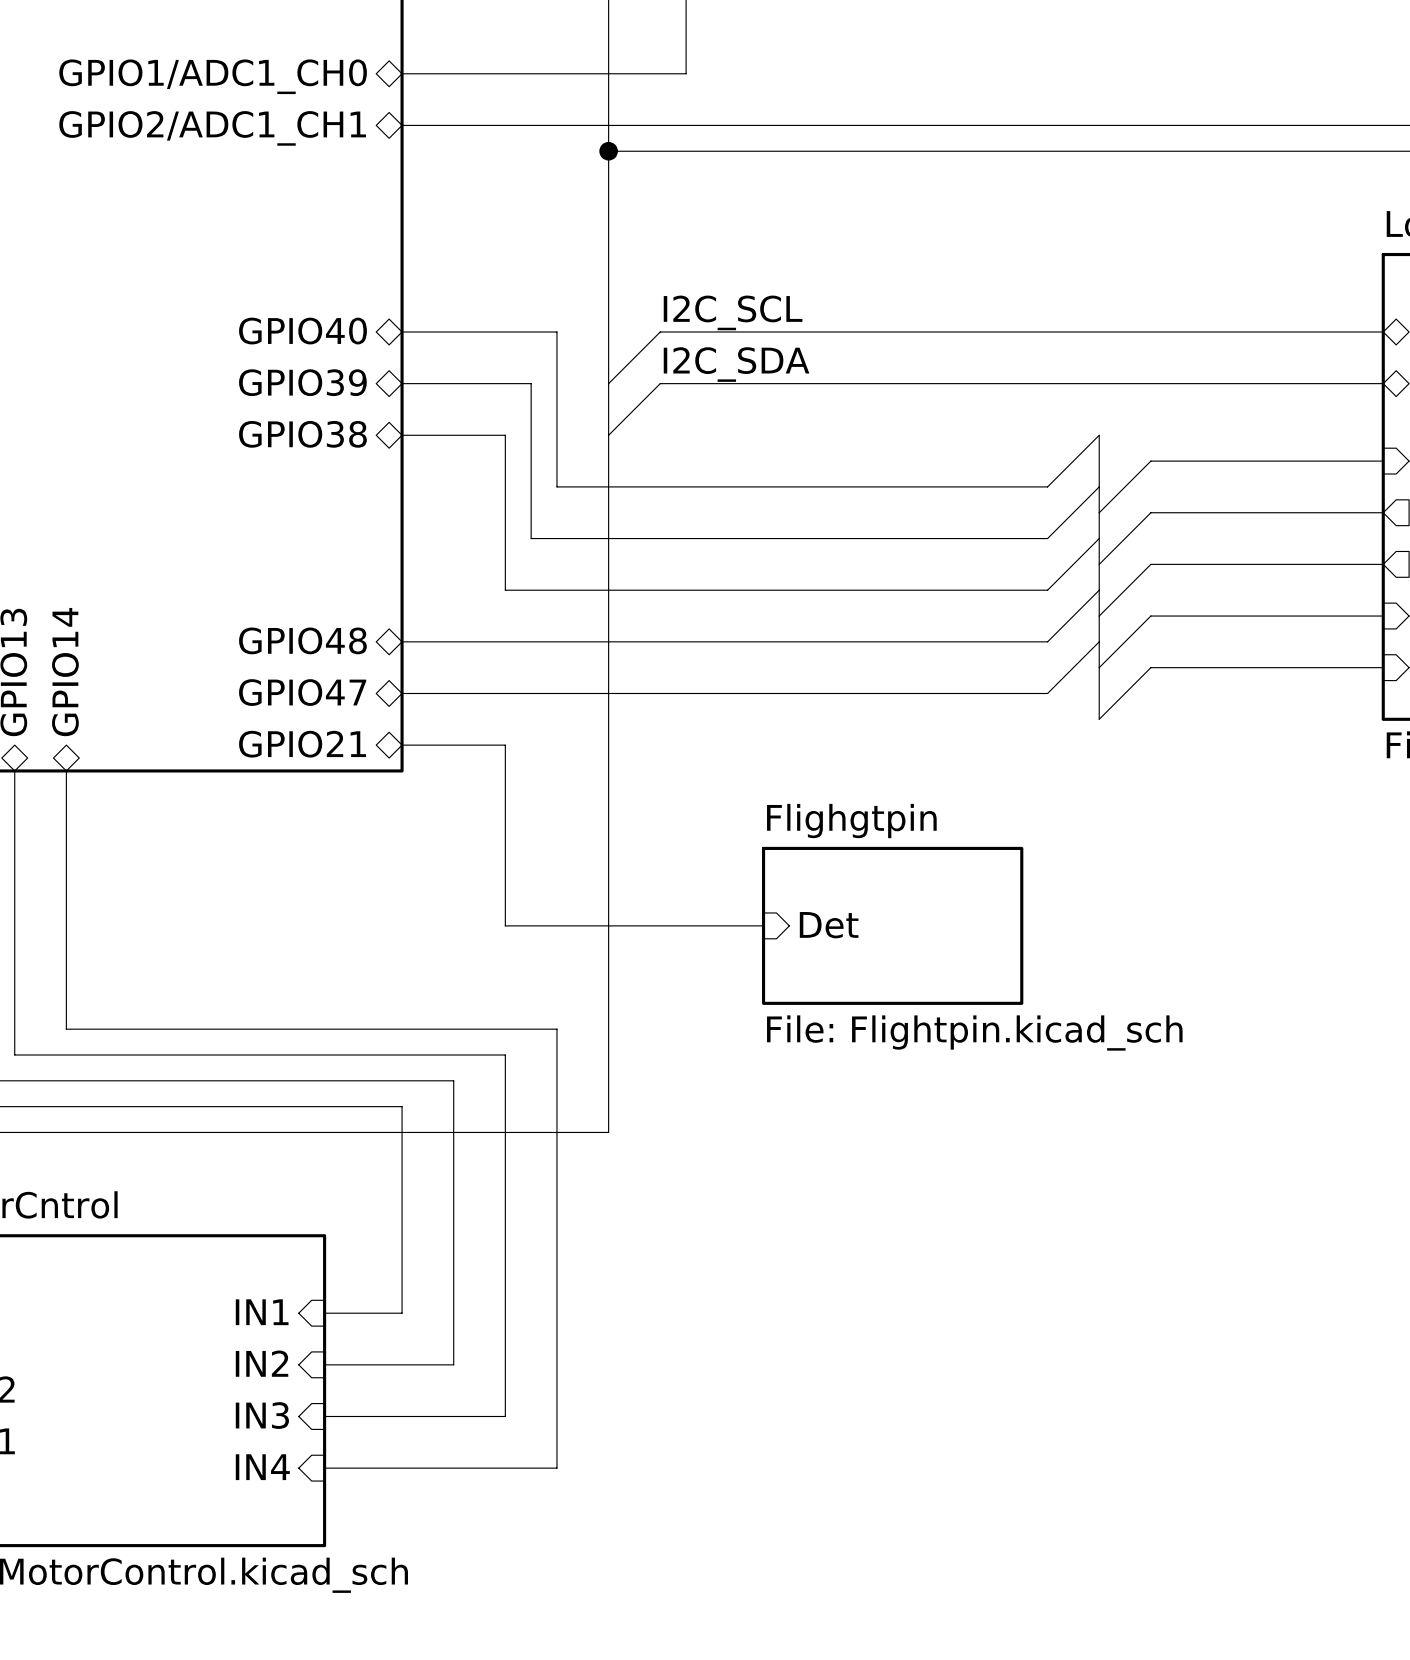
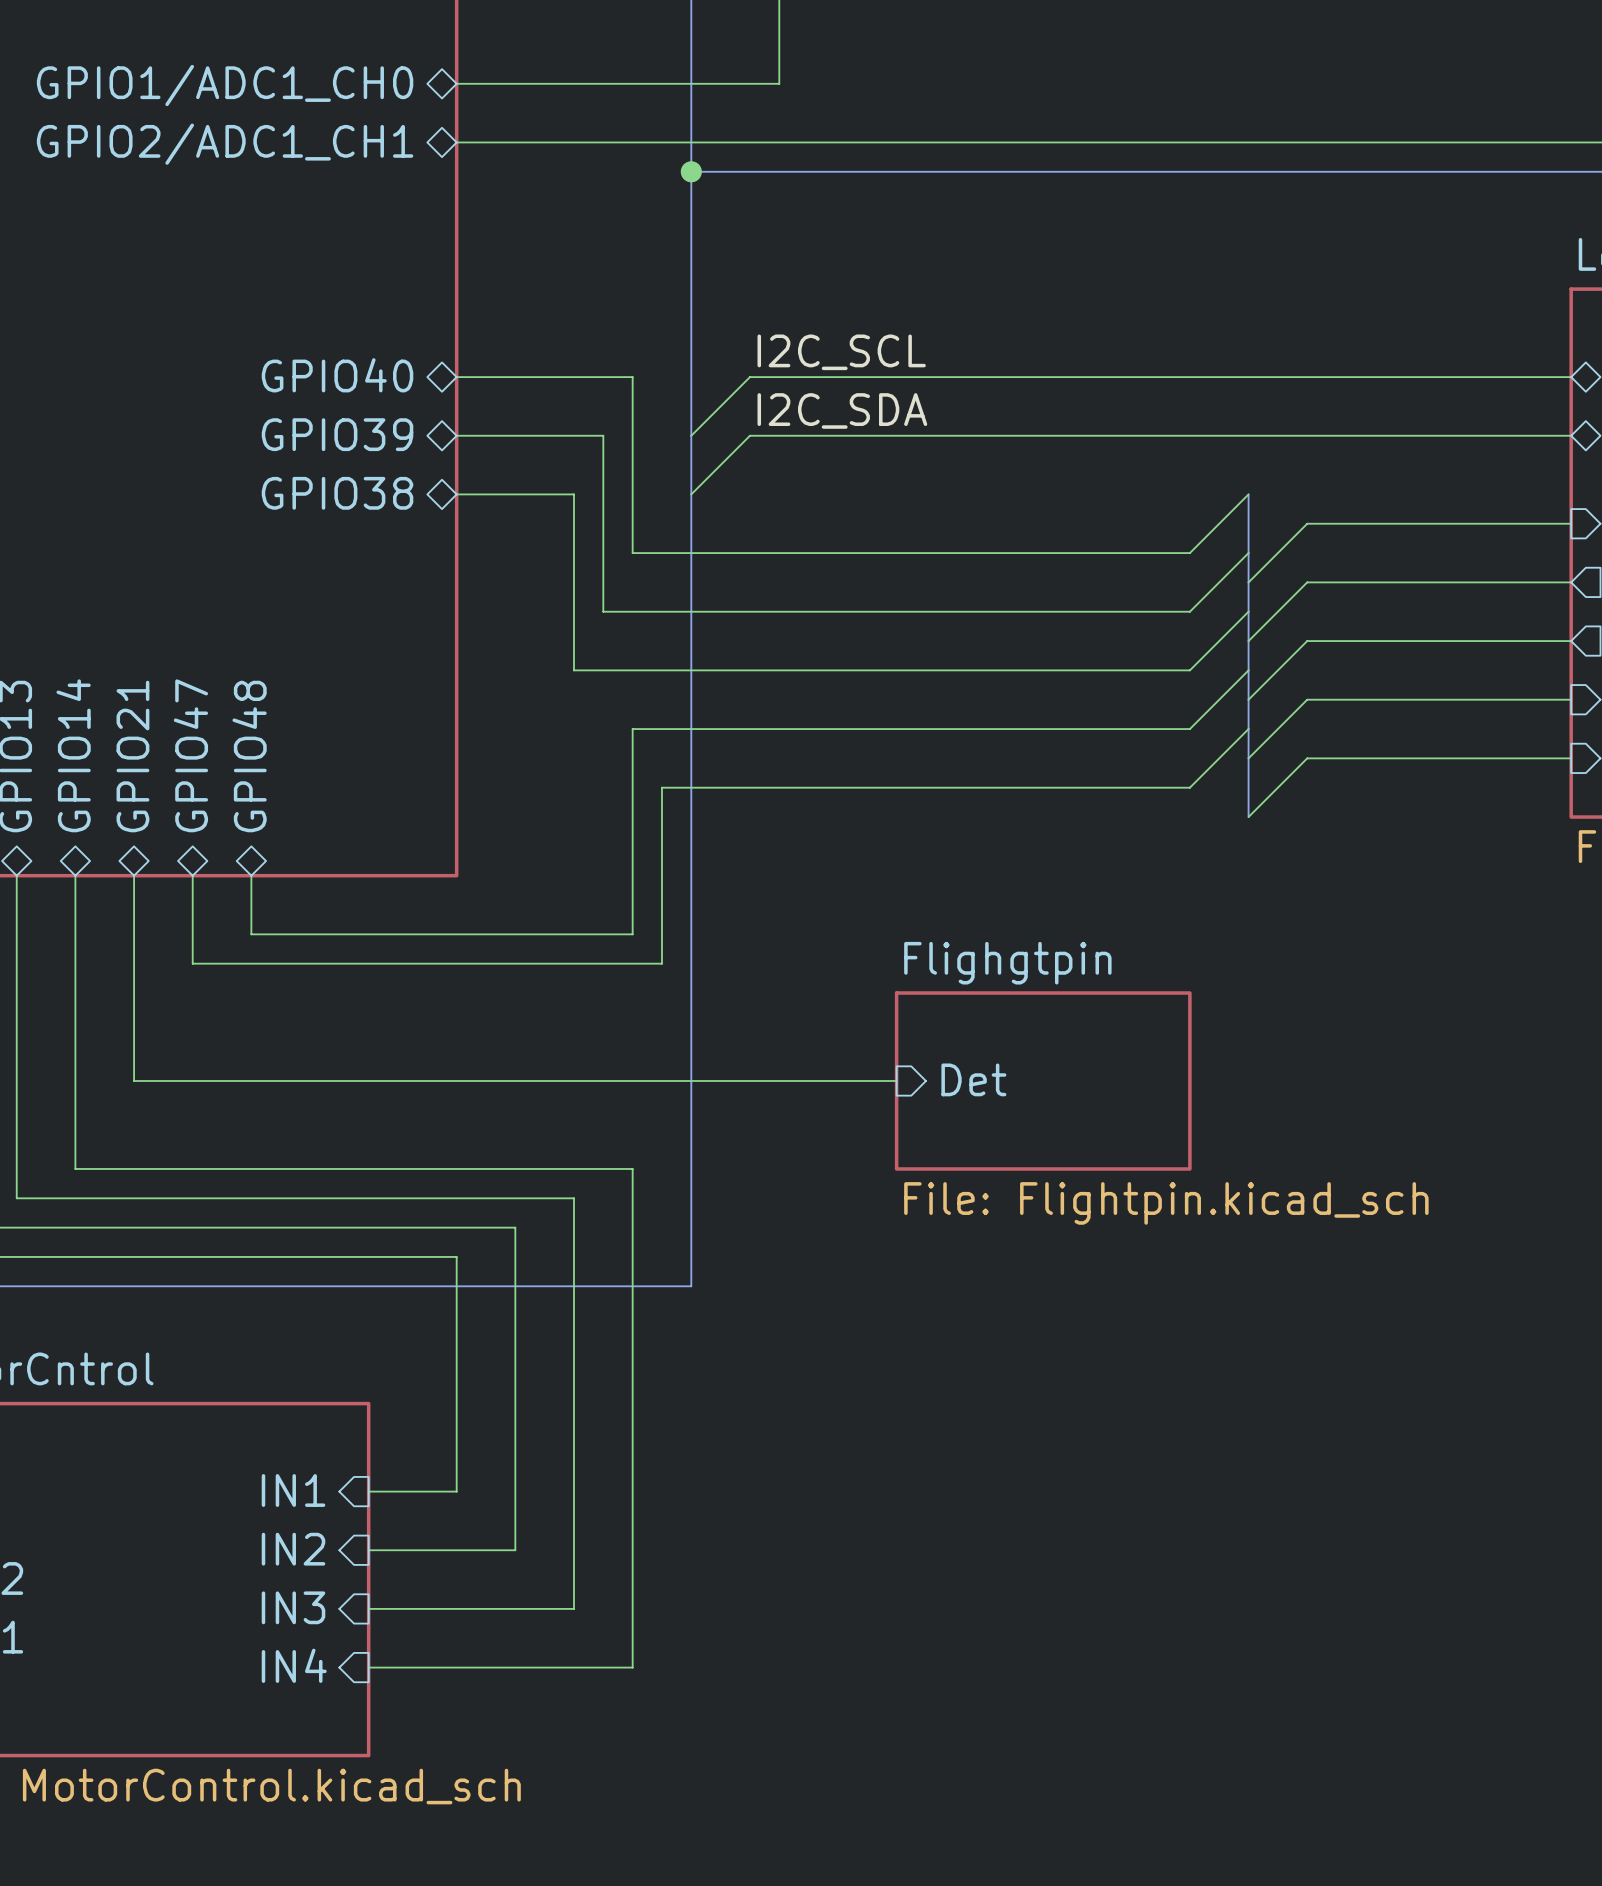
sheet pin rotation: 0° (302, 640) -> 90° clockwise (249, 756)
wire: (402, 641) (556, 641) -> (251, 875) (251, 934) (632, 934) (632, 729)
sheet pin rotation: 0° (302, 692) -> 90° clockwise (190, 755)
wire: (402, 693) (582, 693) -> (192, 875) (192, 963) (661, 963) (661, 787)
sheet pin rotation: 0° (302, 744) -> 90° clockwise (132, 756)
sheet pin position: GPIO21 (302, 744) -> GPIO21 (132, 756)
wire: (402, 745) (505, 745) (505, 925) (763, 925) -> none
wire: none -> (134, 875) (134, 1080) (896, 1080)
sheet pin position: Det (829, 925) -> Det (973, 1079)
sheet Flighgtpin position: (892, 925) -> (1043, 1080)

